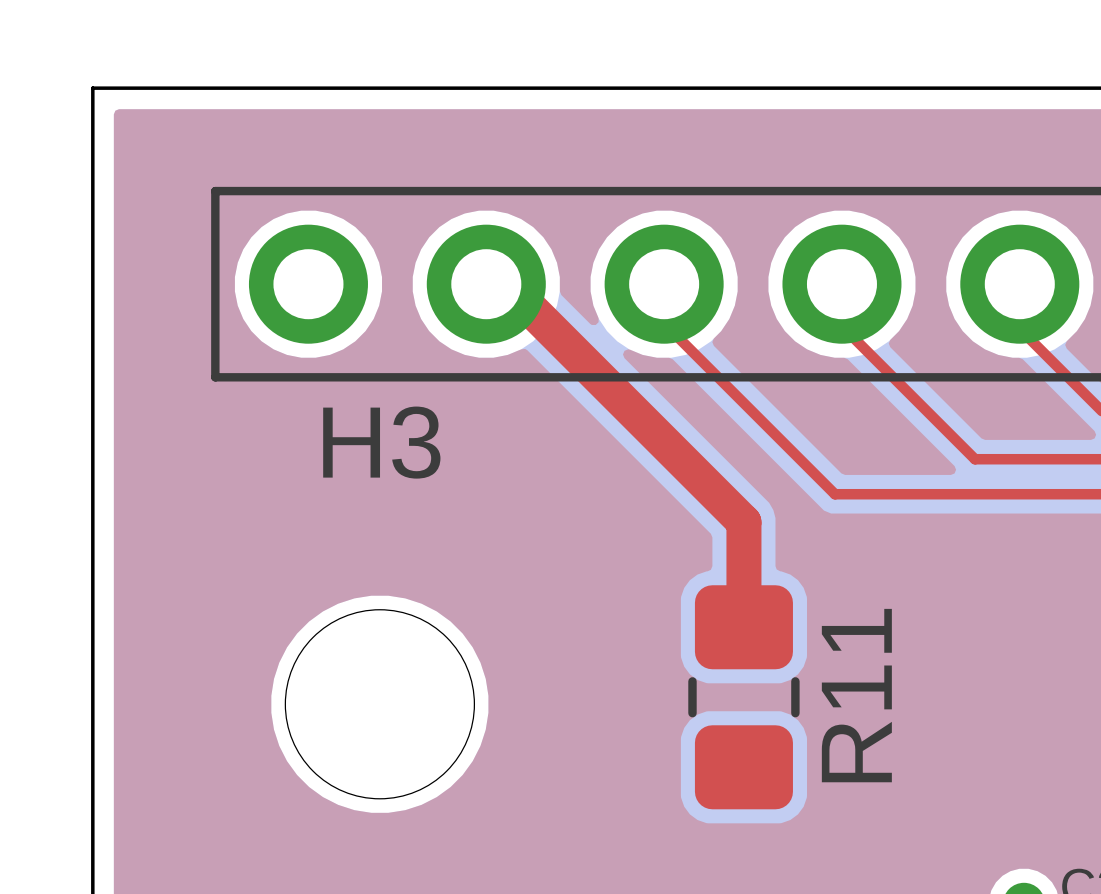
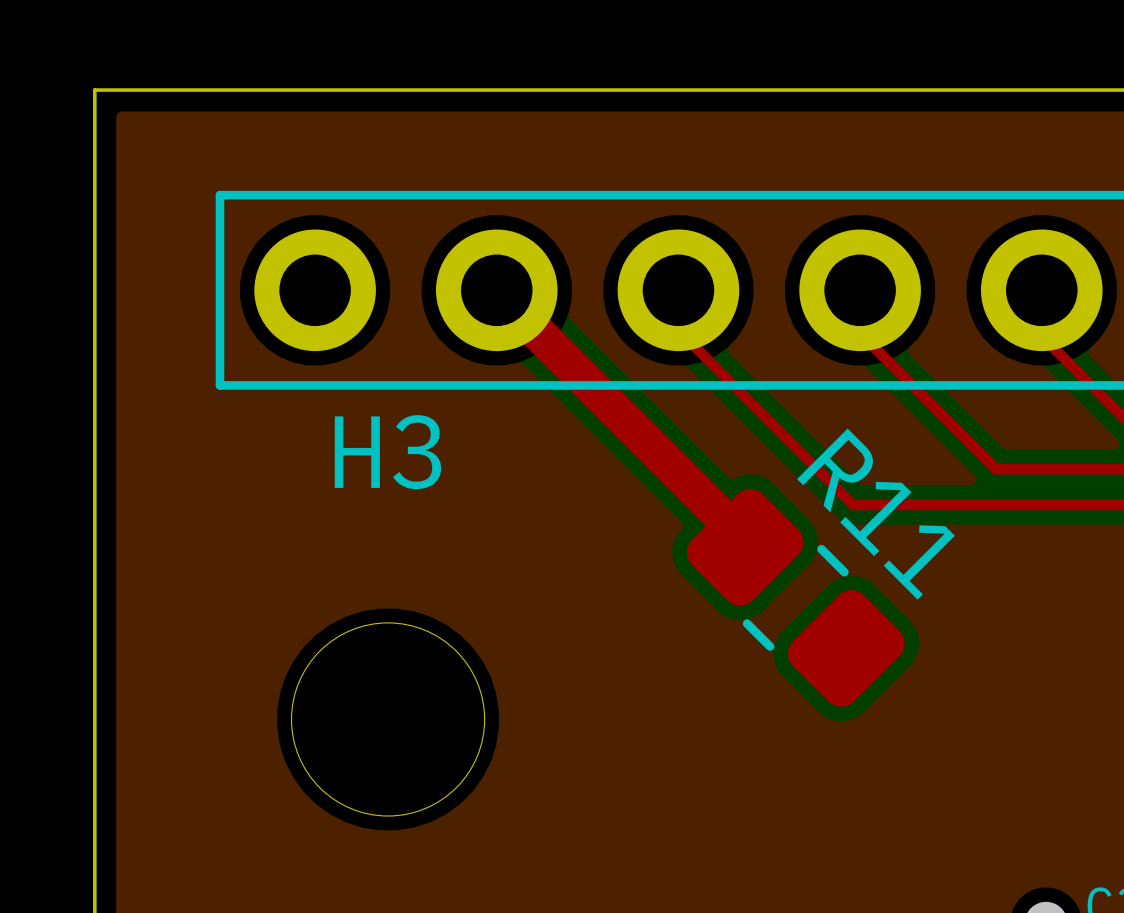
top track: (486, 284) (505, 284) (743, 522) (743, 627) -> (496, 291) (730, 525)
R11 rotation: 0° (743, 697) -> 45° counterclockwise (795, 597)

